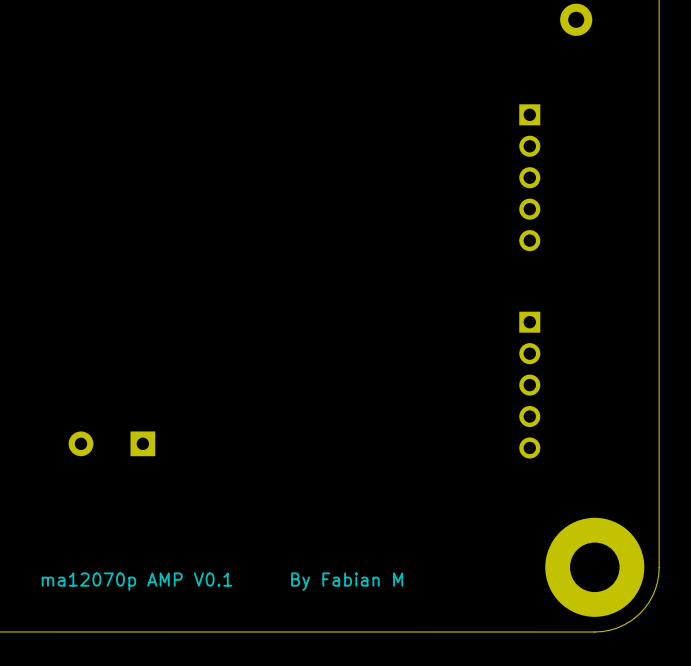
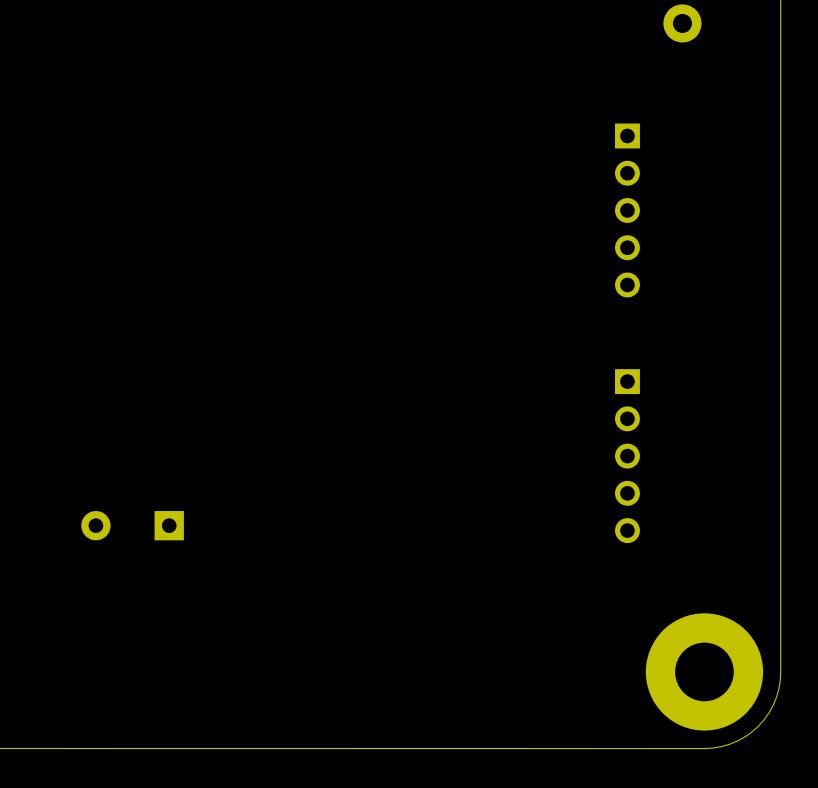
text: ma12070p AMP V0.1 (136, 581) -> none
text: By Fabian M (347, 581) -> none

